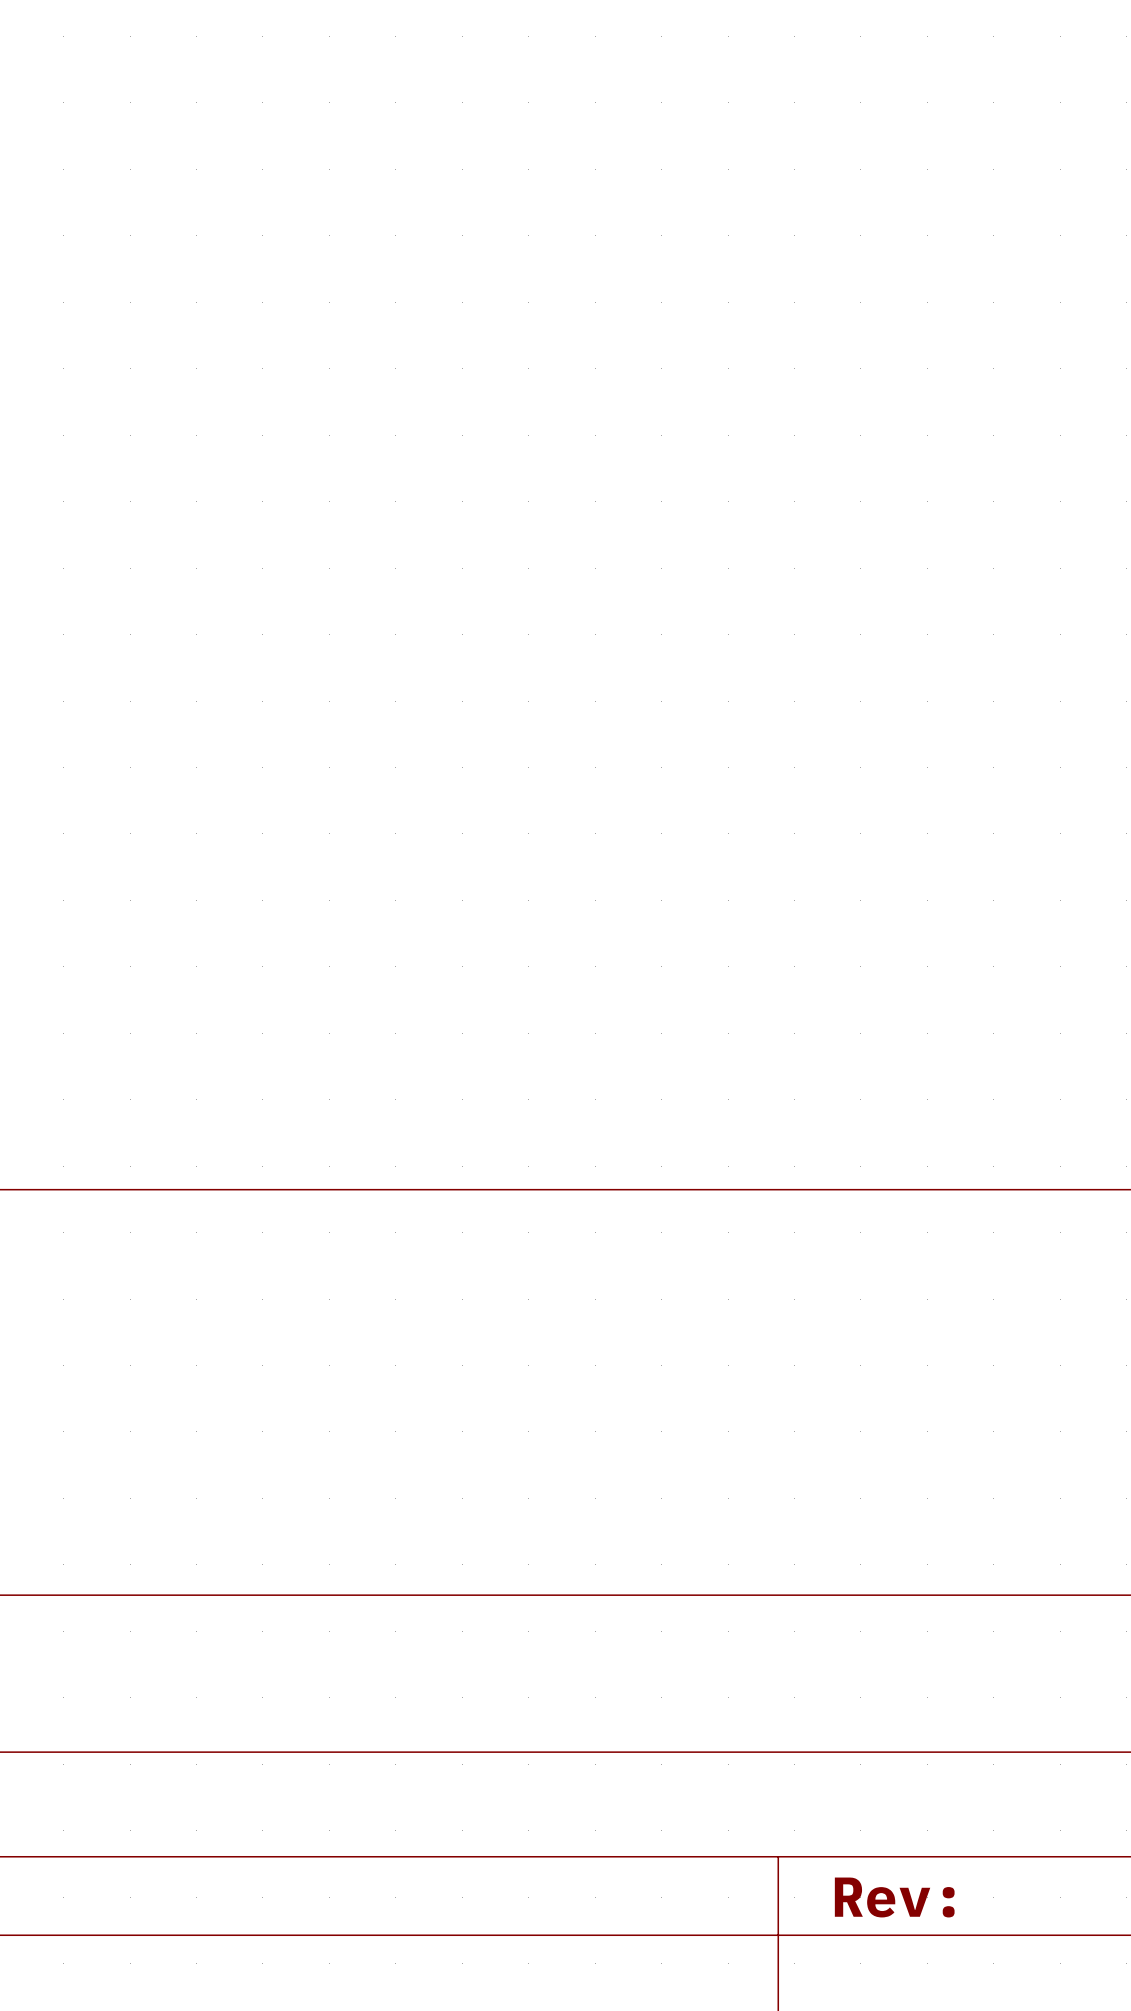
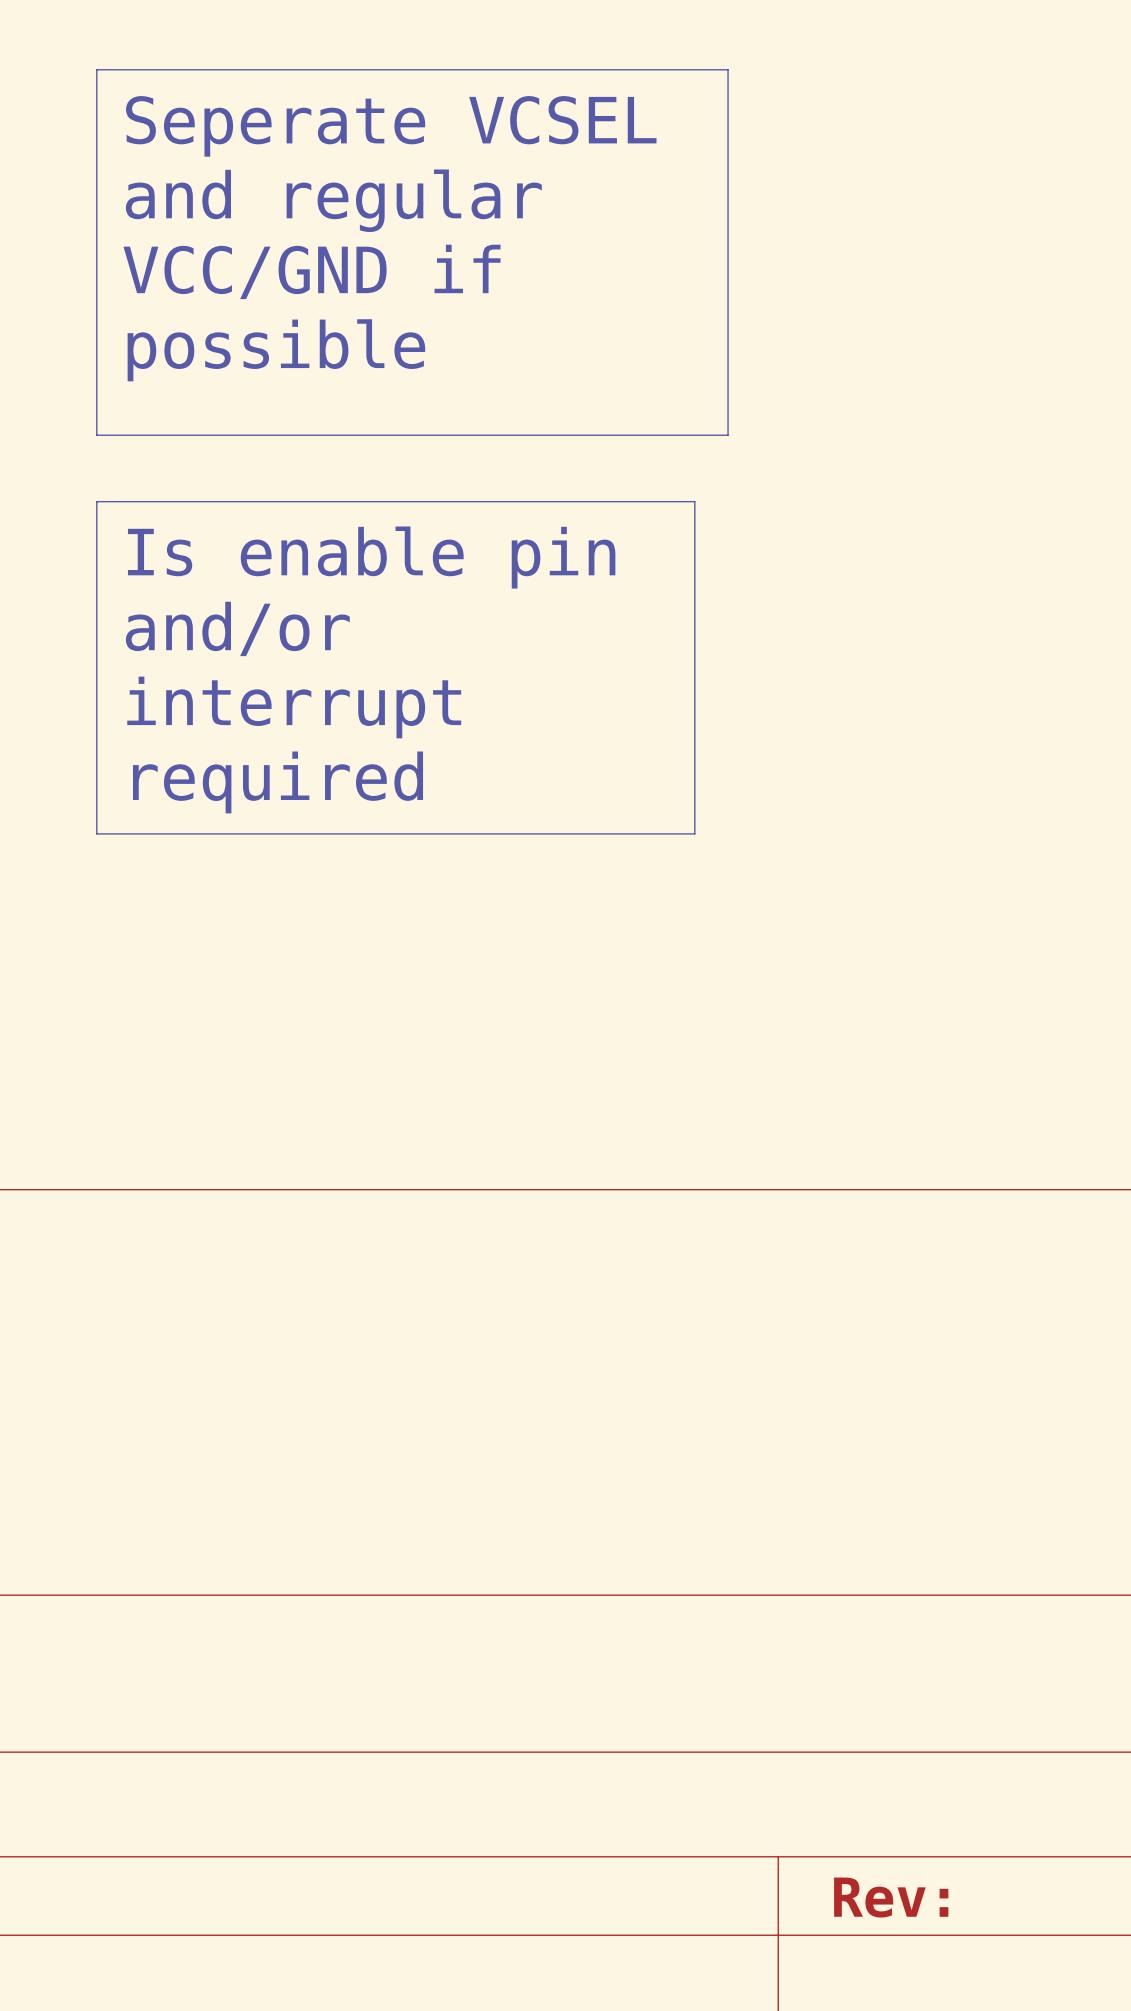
line: none -> (96, 69) (728, 69) (728, 435) (96, 435) (96, 69)
text: none -> Seperate VCSEL (391, 126)
text: none -> and regular (333, 200)
text: none -> VCC/GND if (312, 271)
text: none -> possible (276, 350)
line: none -> (96, 501) (96, 833) (694, 833) (694, 501) (96, 501)
text: none -> Is enable pin (371, 557)
text: none -> and/or (237, 628)
text: none -> interrupt (294, 707)
text: none -> required (278, 782)

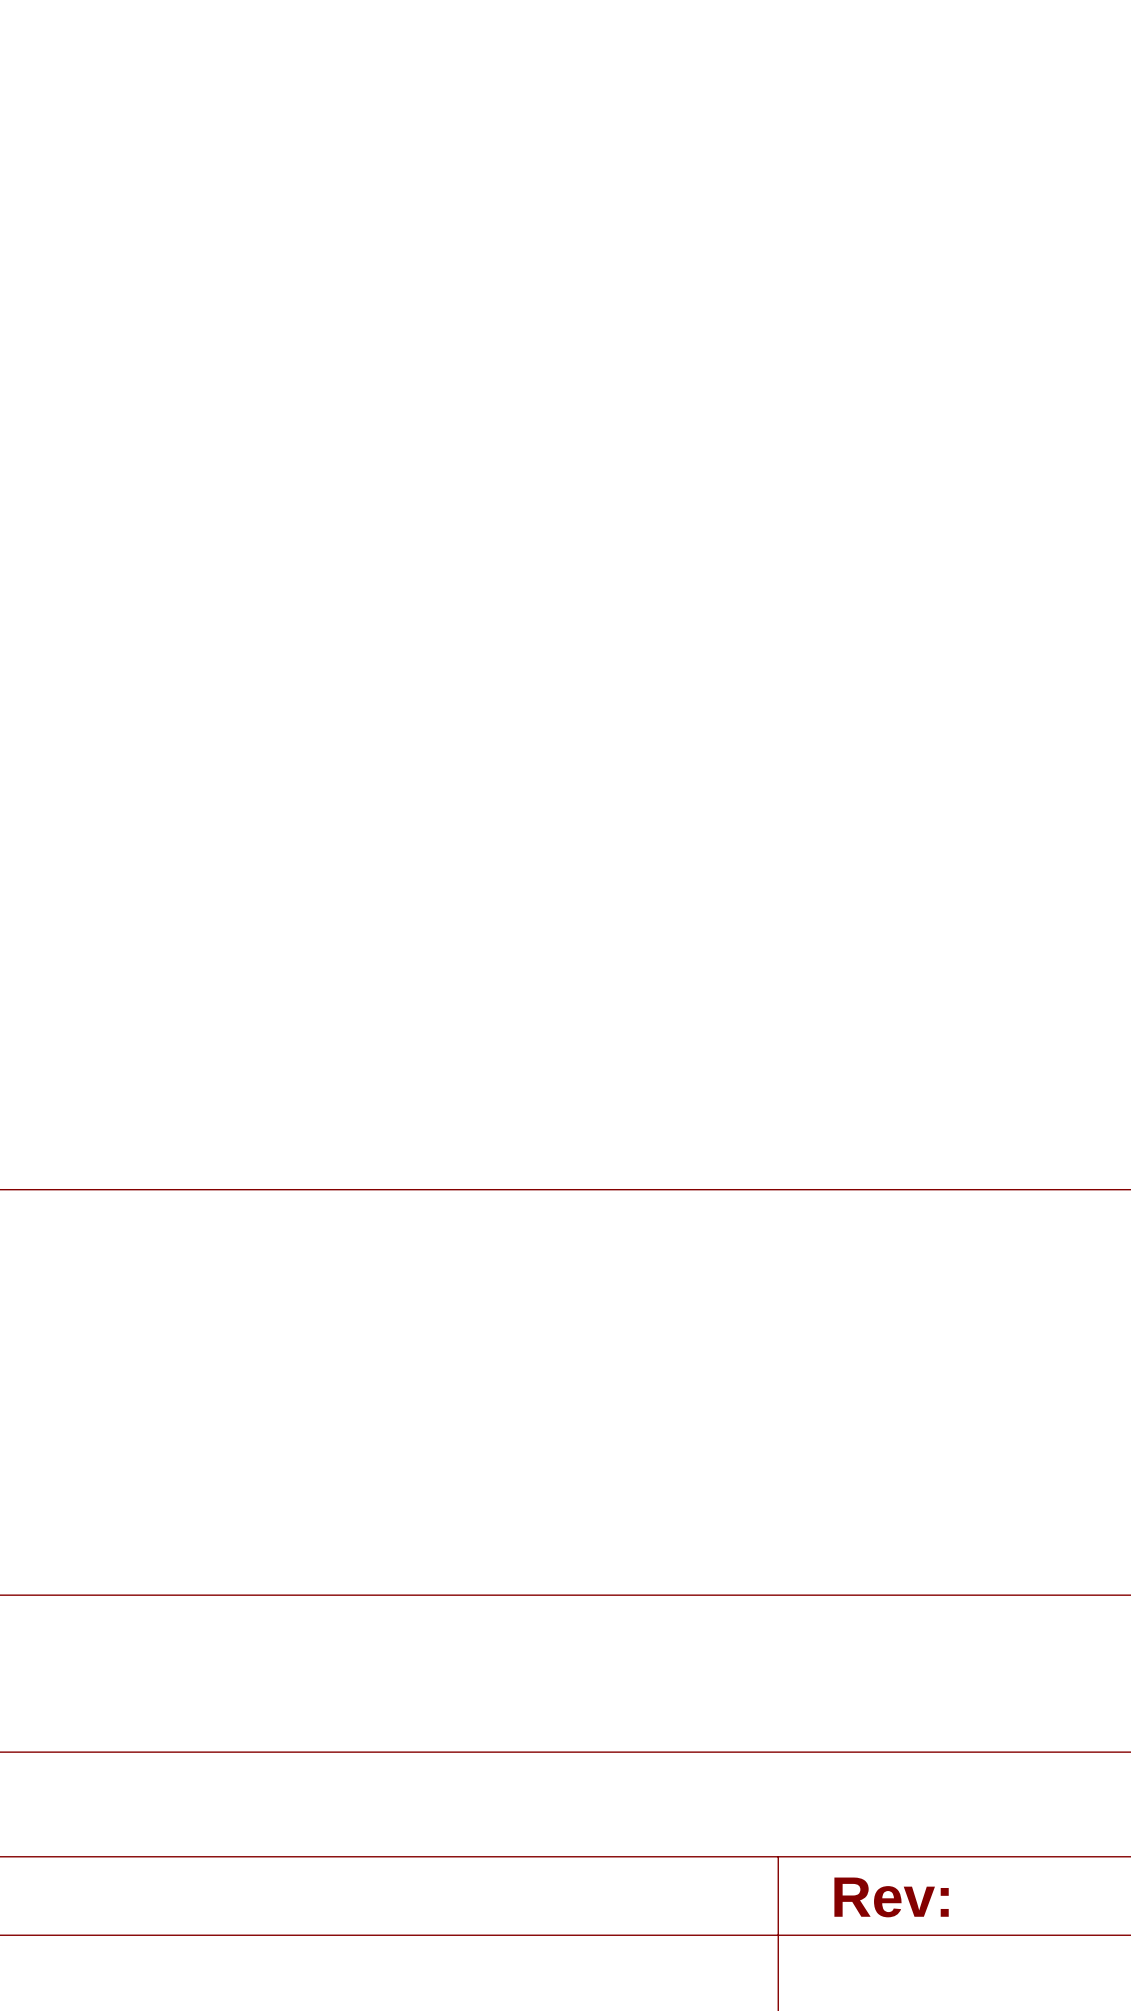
line: (96, 69) (728, 69) (728, 435) (96, 435) (96, 69) -> none
text: Seperate VCSEL (391, 126) -> none
text: and regular (333, 200) -> none
text: VCC/GND if (312, 271) -> none
text: possible (276, 350) -> none
line: (96, 501) (96, 833) (694, 833) (694, 501) (96, 501) -> none
text: Is enable pin (371, 557) -> none
text: and/or (237, 628) -> none
text: interrupt (294, 707) -> none
text: required (278, 782) -> none

